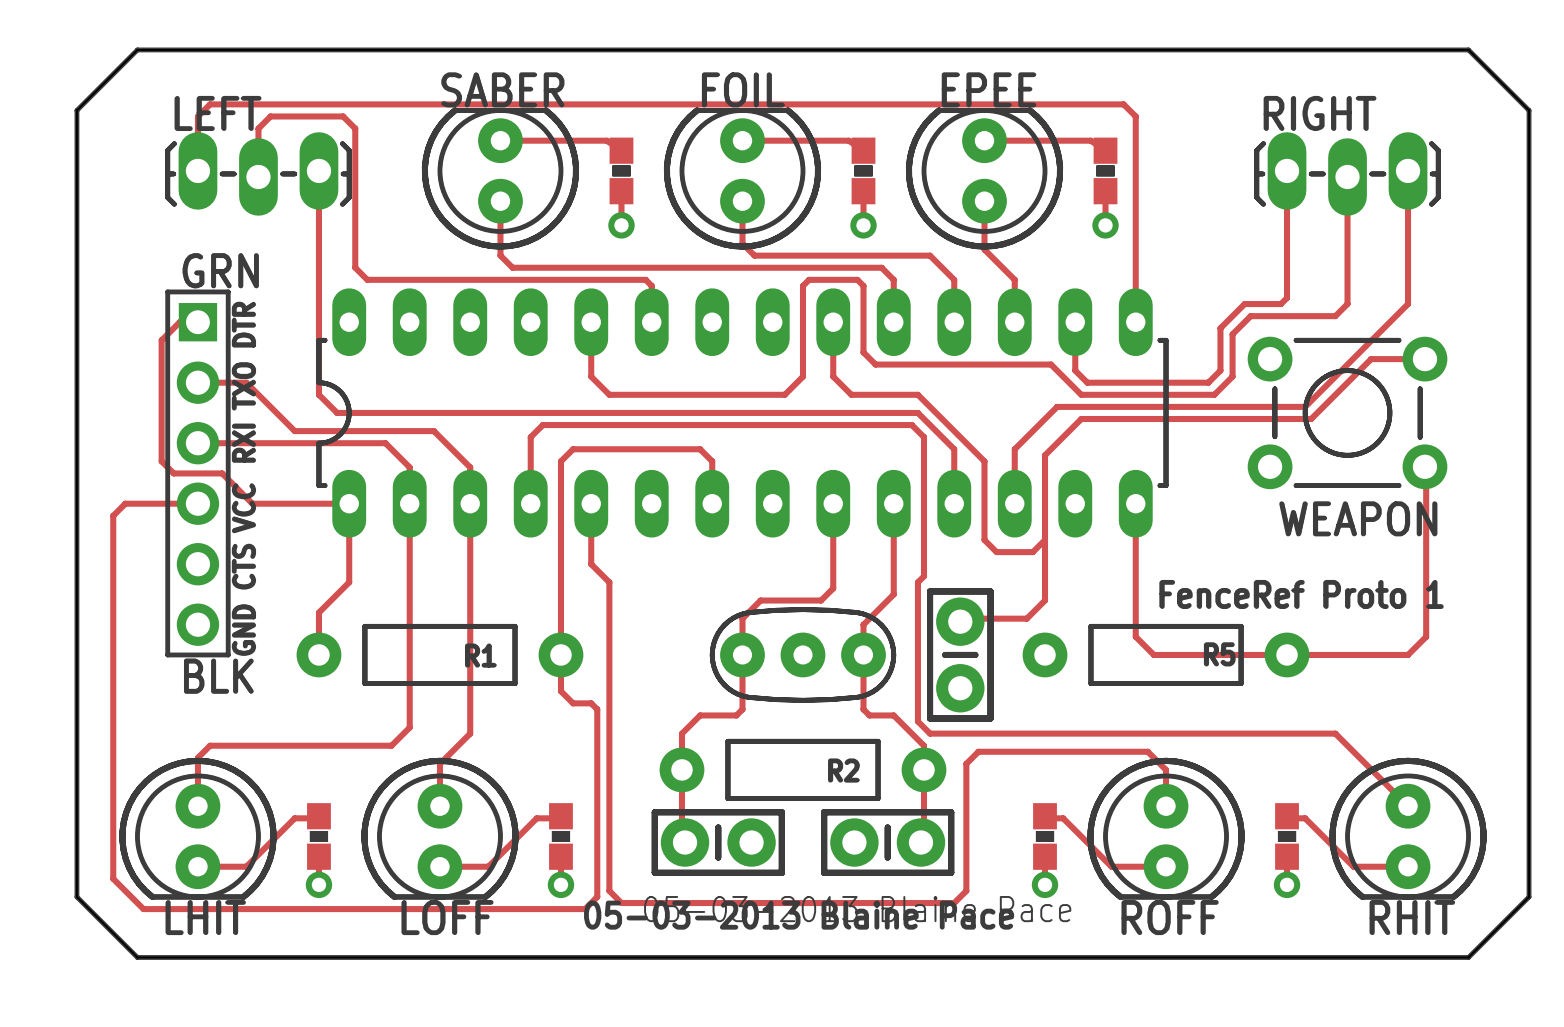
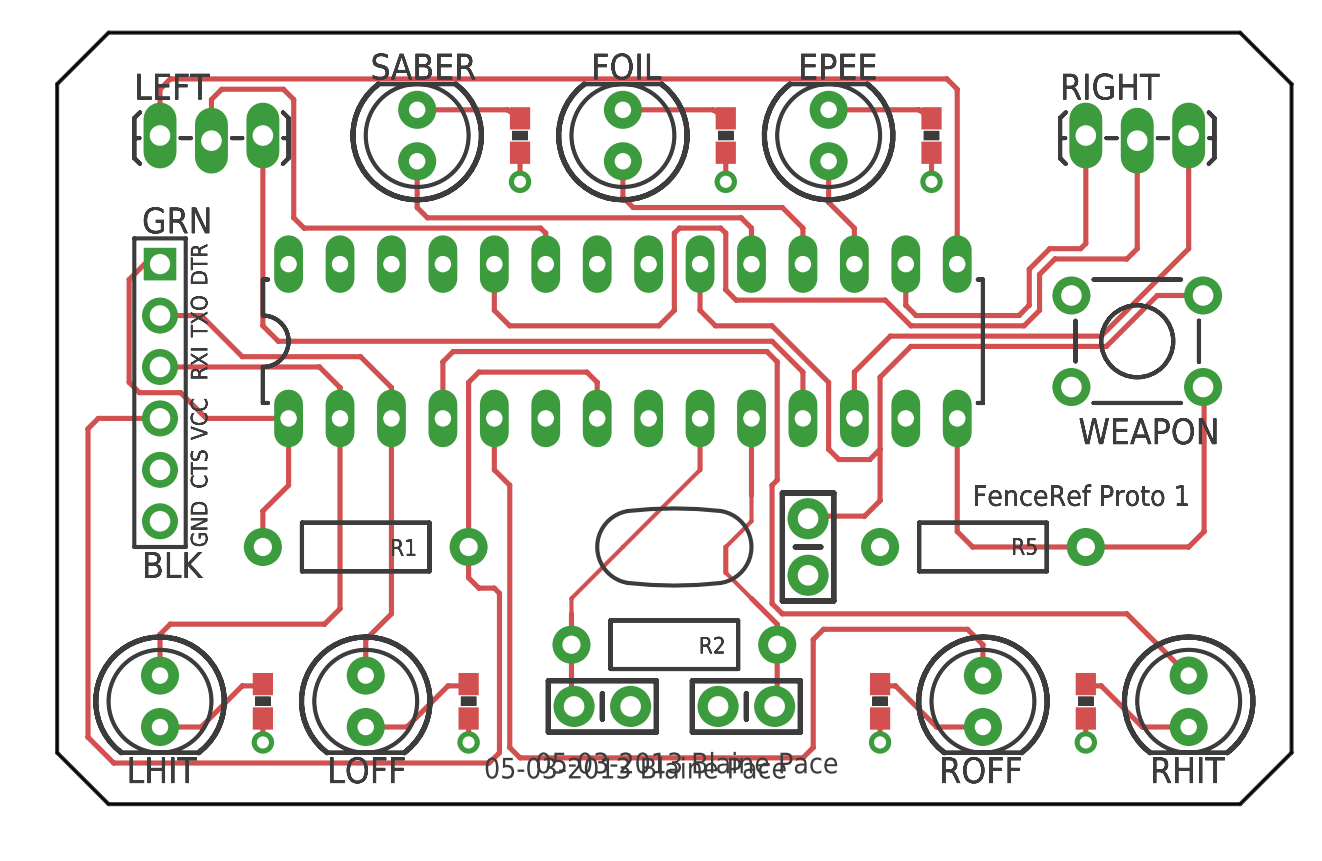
track: (833, 564) (833, 588) (821, 600) (760, 600) (742, 618) (742, 709) (736, 715) (700, 715) (681, 733) -> (700, 469) (571, 598) (571, 613)
track: (893, 594) (863, 624) (863, 654) -> (751, 495) (751, 521) (725, 546)
part: (802, 654) -> none
track: (863, 685) (863, 709) (869, 715) (893, 715) -> (725, 572) (751, 598)

